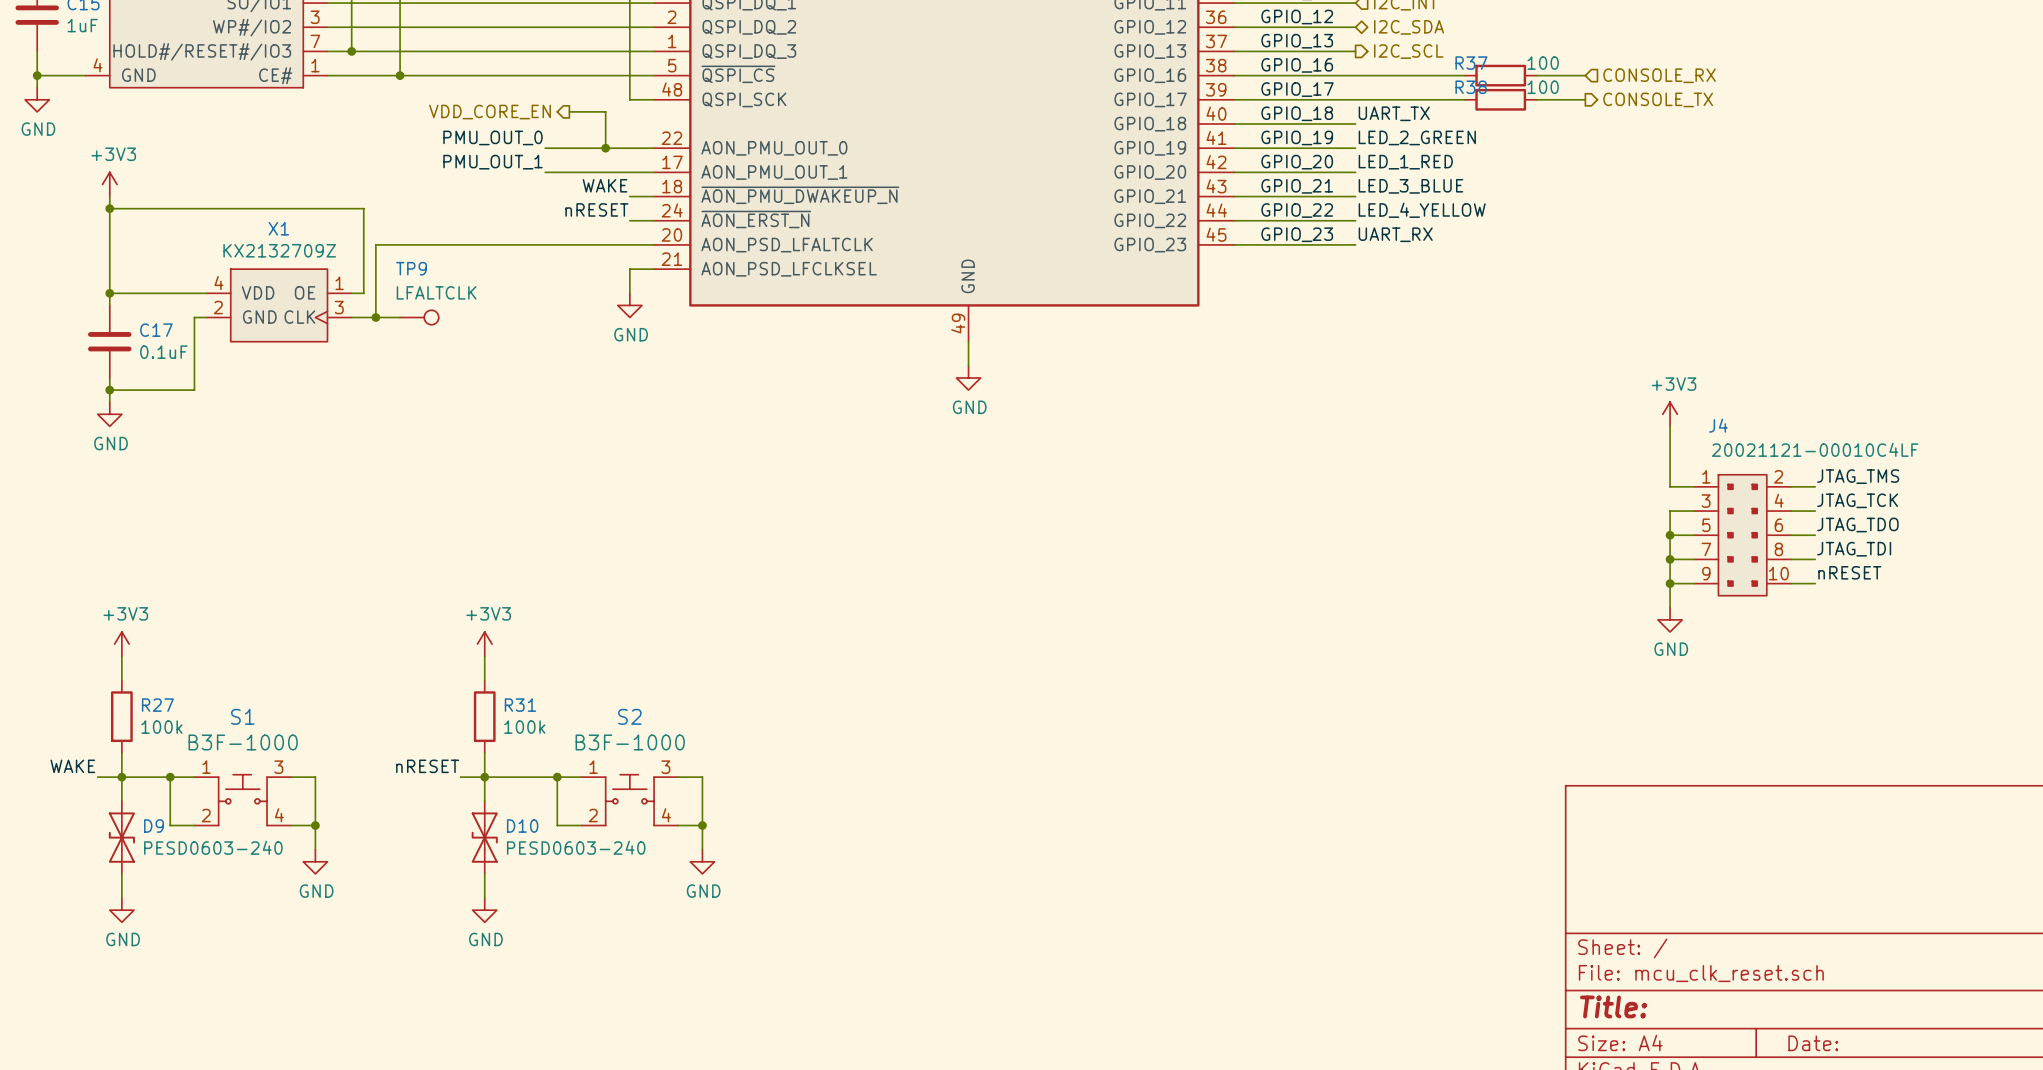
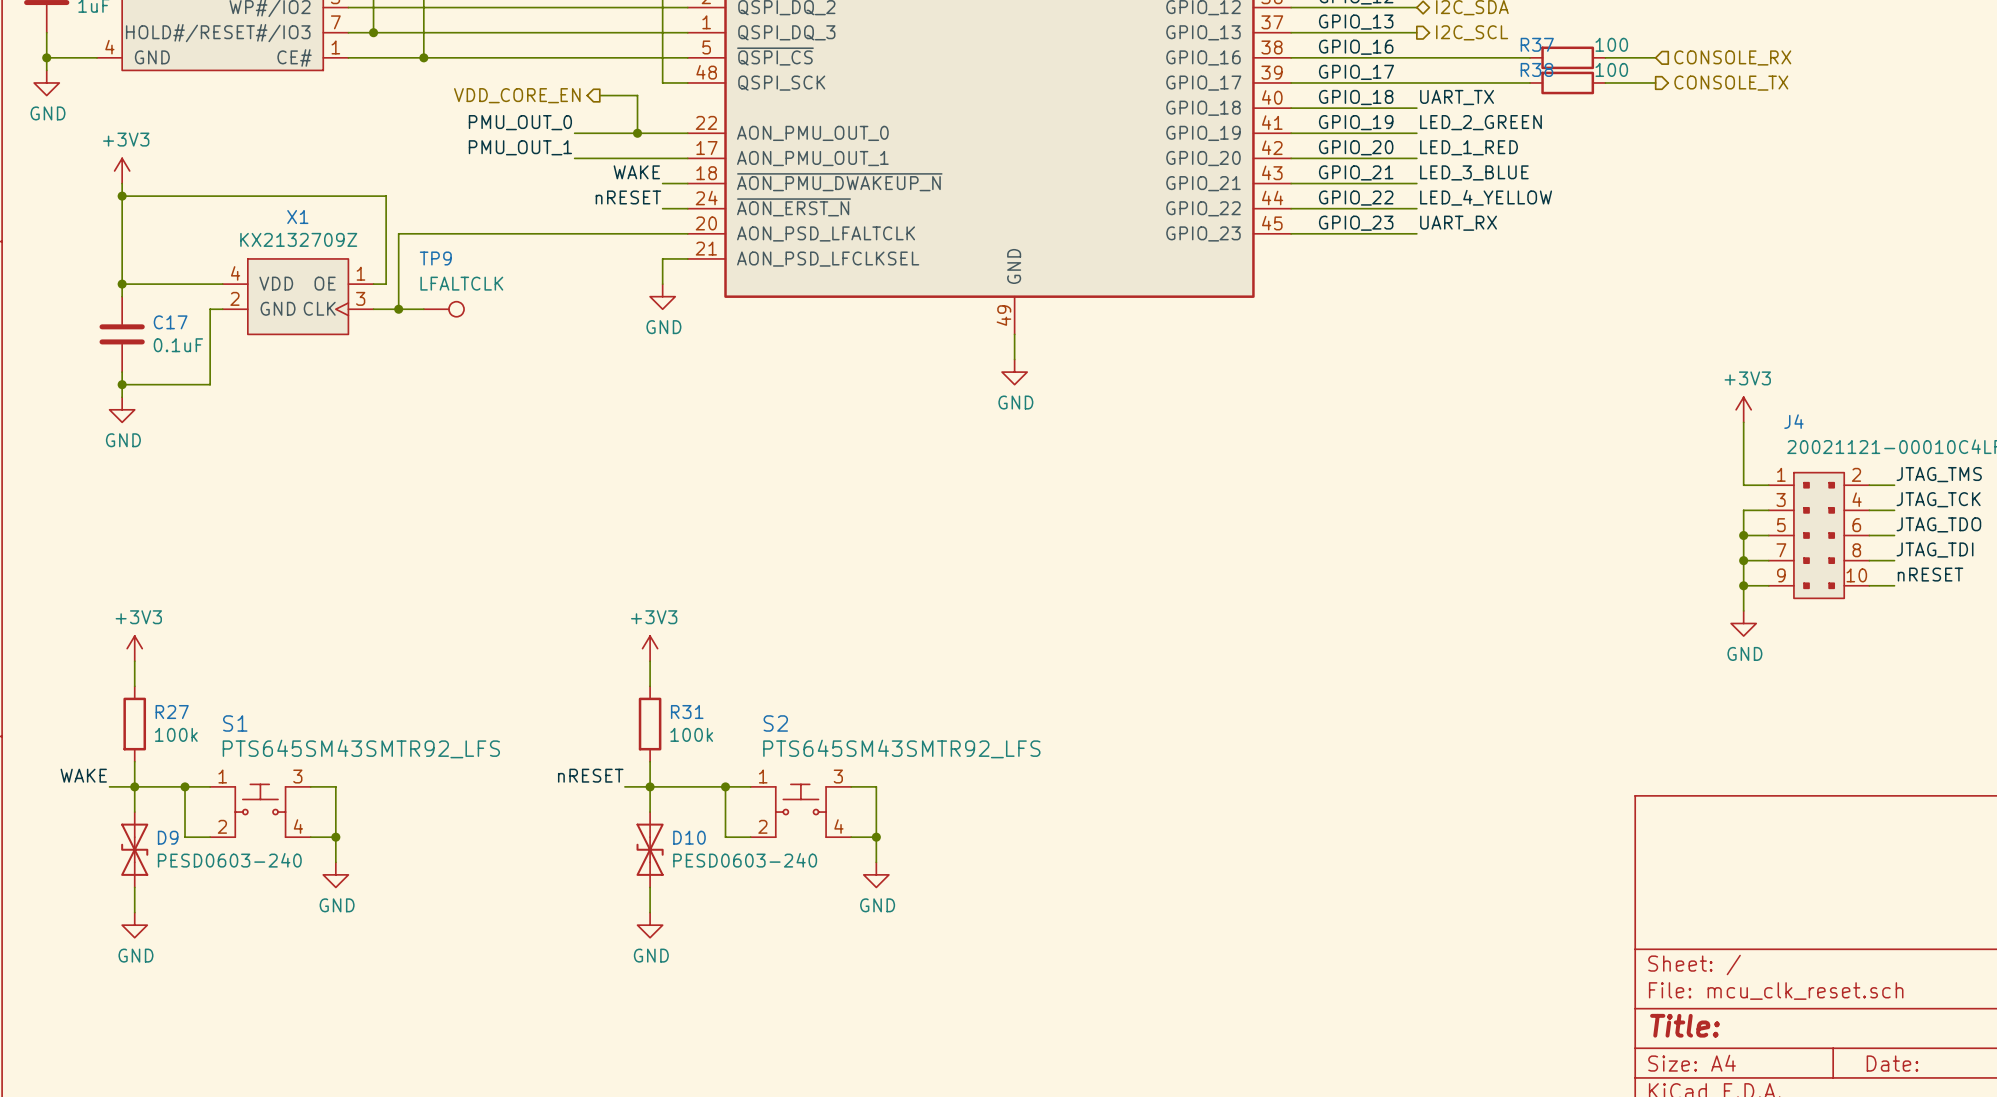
power symbol position: +3V3 (484, 644) -> +3V3 (650, 648)
wire: (484, 656) (484, 680) -> (650, 661) (650, 686)
S1 name position: S1 (242, 716) -> S1 (235, 723)
R31 position: (484, 716) -> (650, 724)
S2 name position: S2 (629, 716) -> S2 (775, 723)
S1 value: B3F-1000 (243, 742) -> PTS645SM43SMTR92_LFS (361, 748)
S2 value: B3F-1000 (630, 742) -> PTS645SM43SMTR92_LFS (901, 748)
wire: (484, 752) (484, 801) -> (650, 761) (650, 812)
label position: nRESET (427, 766) -> nRESET (590, 775)
wire: (460, 777) (581, 777) -> none
junction: (484, 777) -> none
wire: (557, 777) (557, 825) (581, 825) -> none
junction: (557, 777) -> none
wire: none -> (624, 786) (712, 786)
junction: none -> (650, 786)
junction: none -> (725, 786)
wire: (702, 777) (702, 849) -> (738, 786) (750, 786)
wire: none -> (851, 786) (876, 786) (876, 862)
S2 position: (629, 800) -> (800, 810)
wire: (678, 825) (690, 825) -> (725, 786) (725, 837)
wire: none -> (738, 837) (750, 837)
junction: (702, 825) -> none
wire: none -> (851, 837) (876, 837)
junction: none -> (876, 837)
D10 position: (484, 837) -> (650, 849)
power symbol: GND (702, 861) -> none
power symbol: none -> GND (876, 874)
wire: (484, 873) (484, 898) -> (650, 887) (650, 912)
power symbol: GND (484, 910) -> none
power symbol: none -> GND (650, 925)

